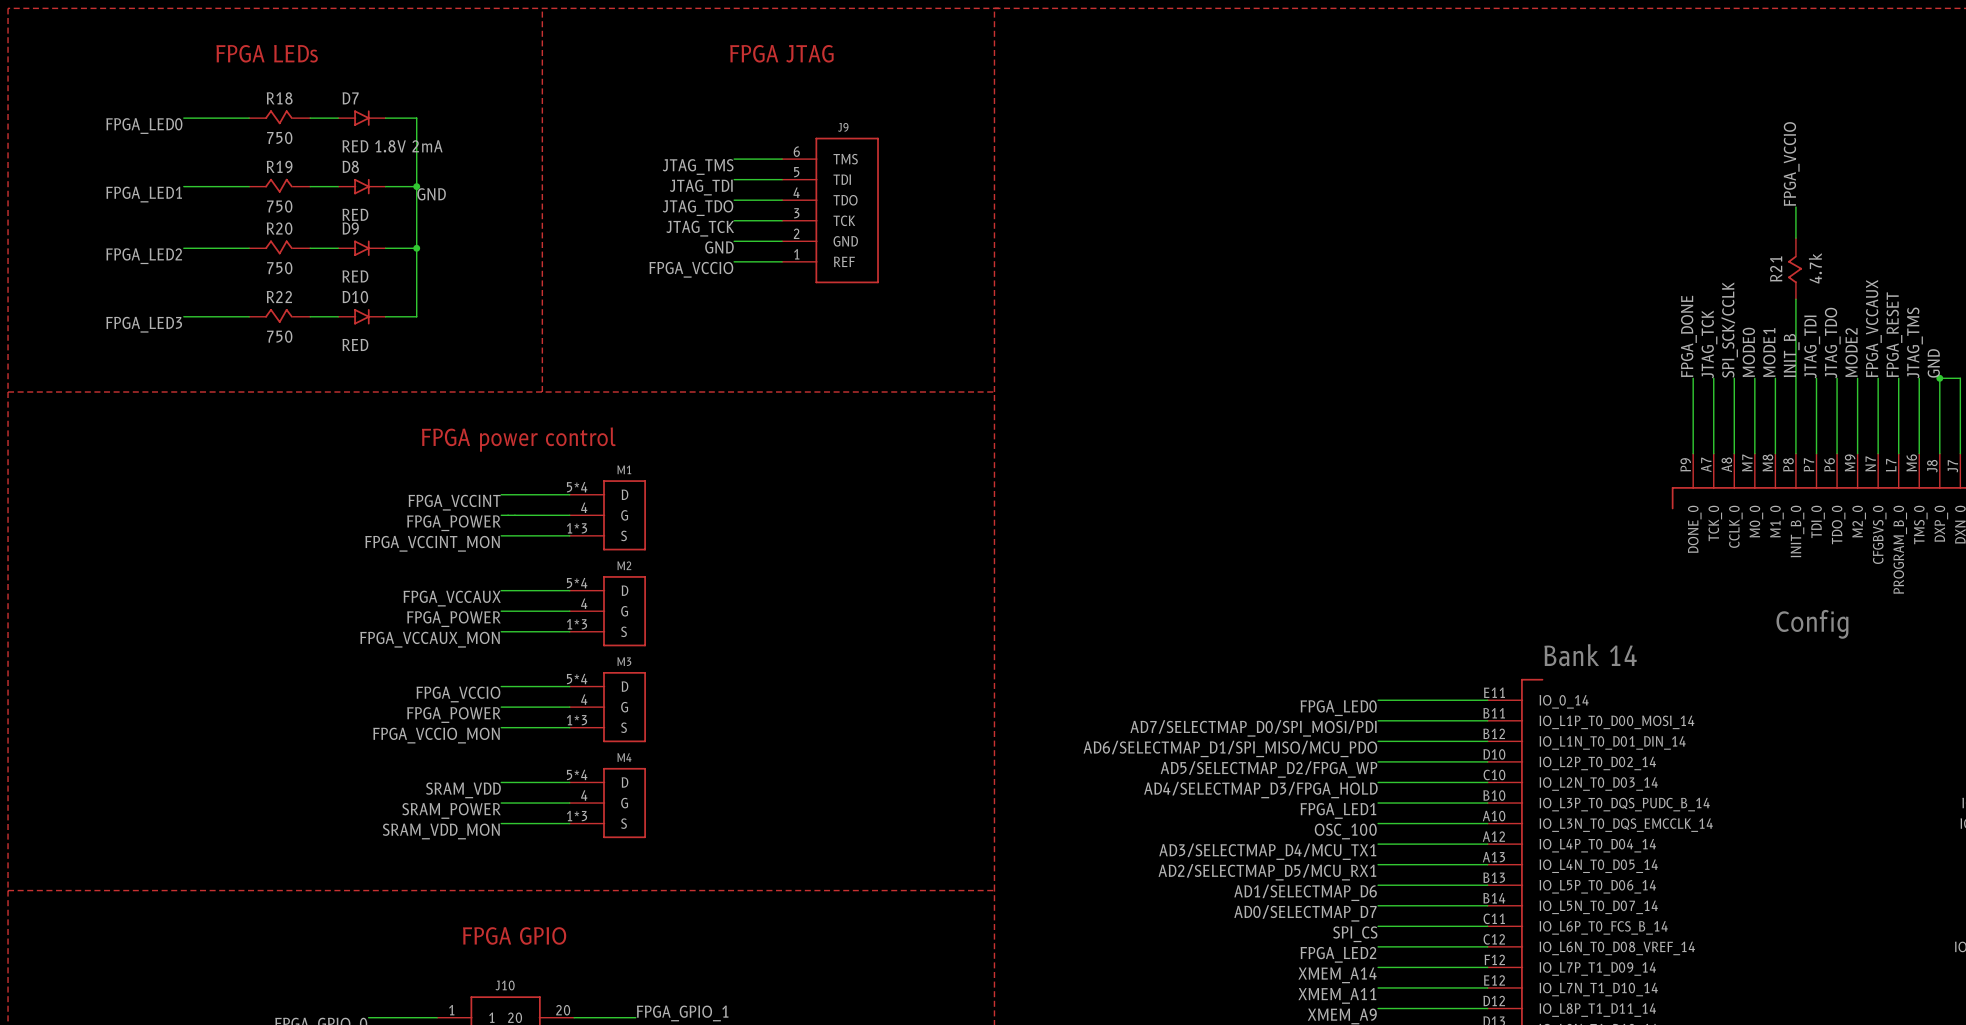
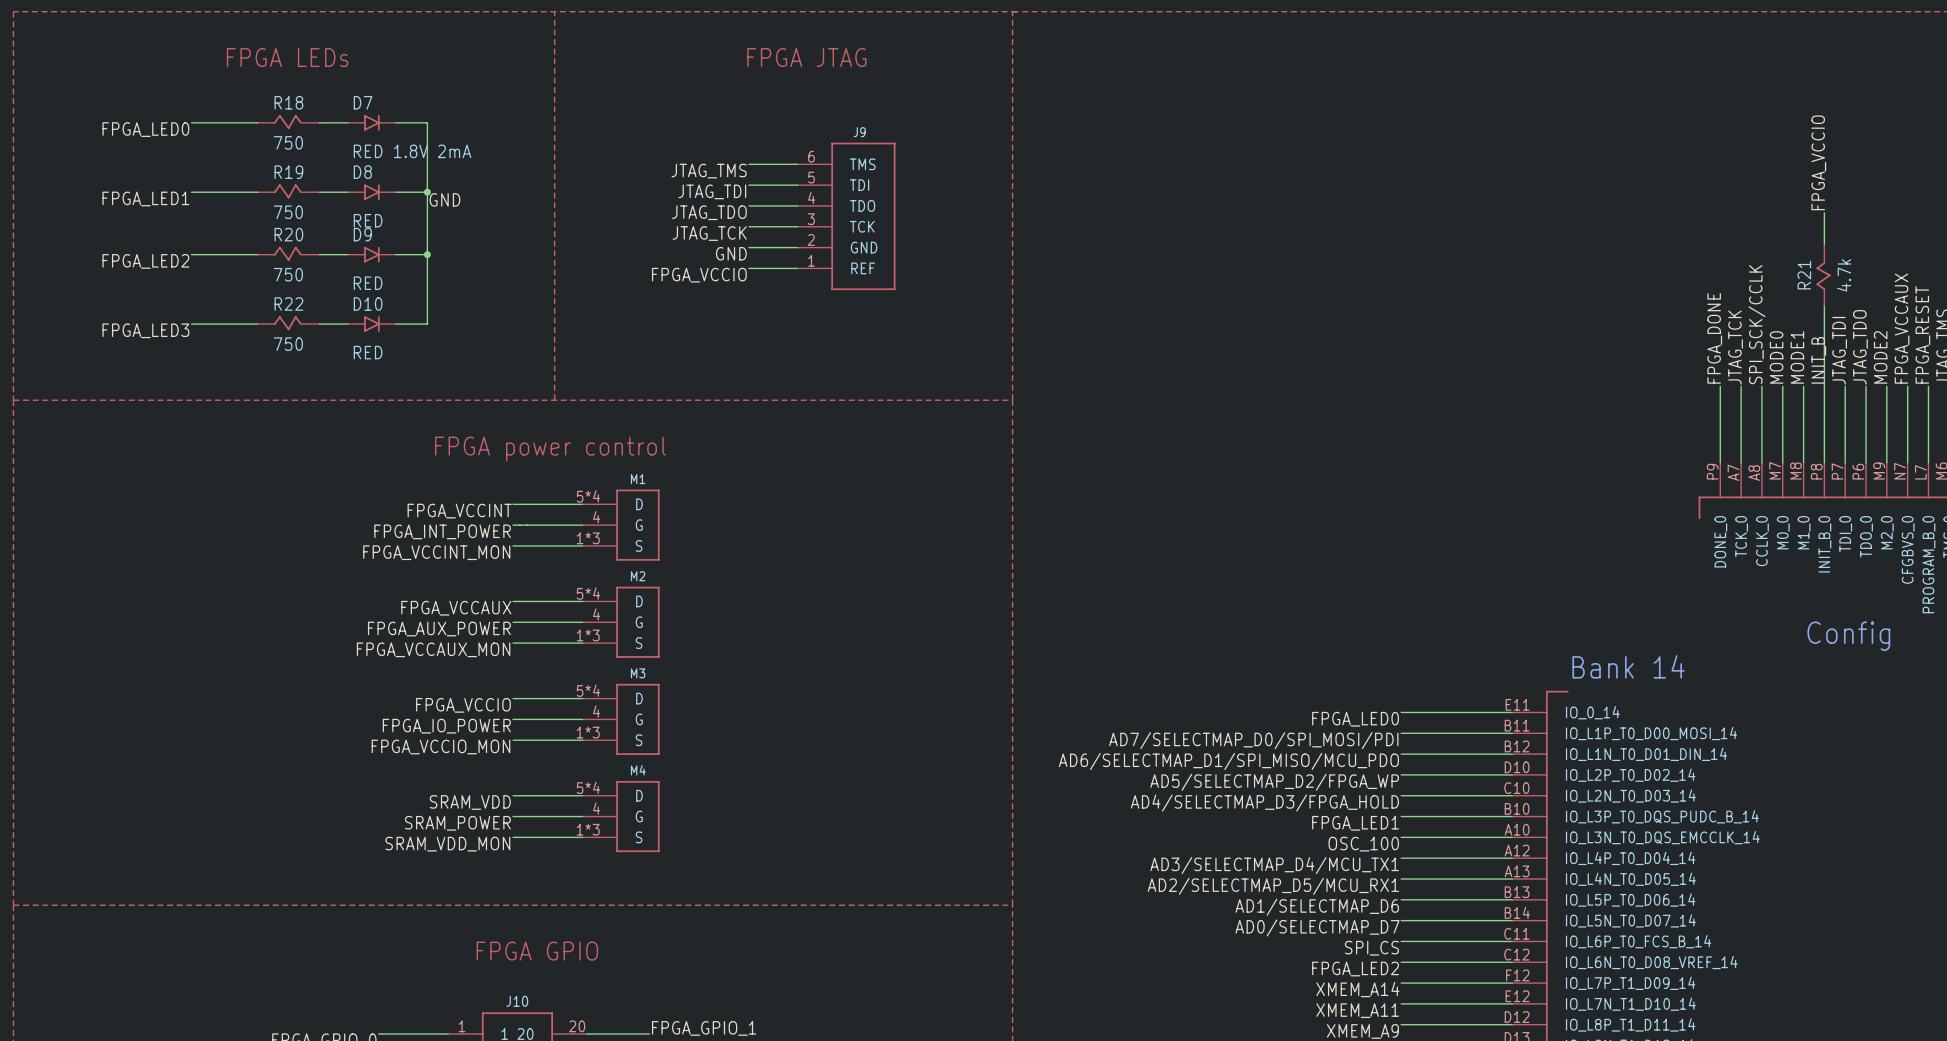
label: FPGA_POWER (453, 523) -> FPGA_INT_POWER (442, 531)
label: FPGA_POWER (453, 619) -> FPGA_AUX_POWER (439, 629)
label: FPGA_POWER (453, 715) -> FPGA_IO_POWER (446, 726)

